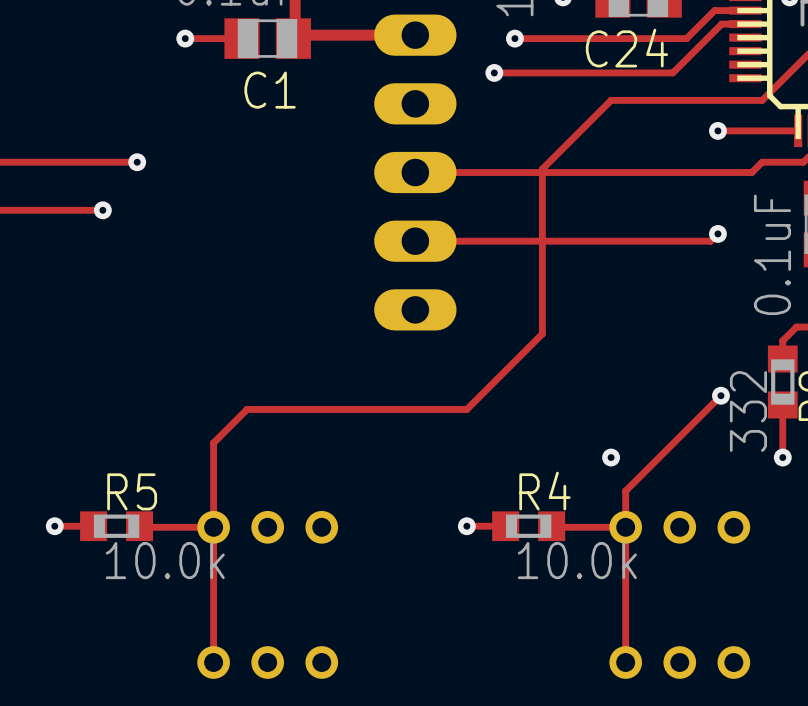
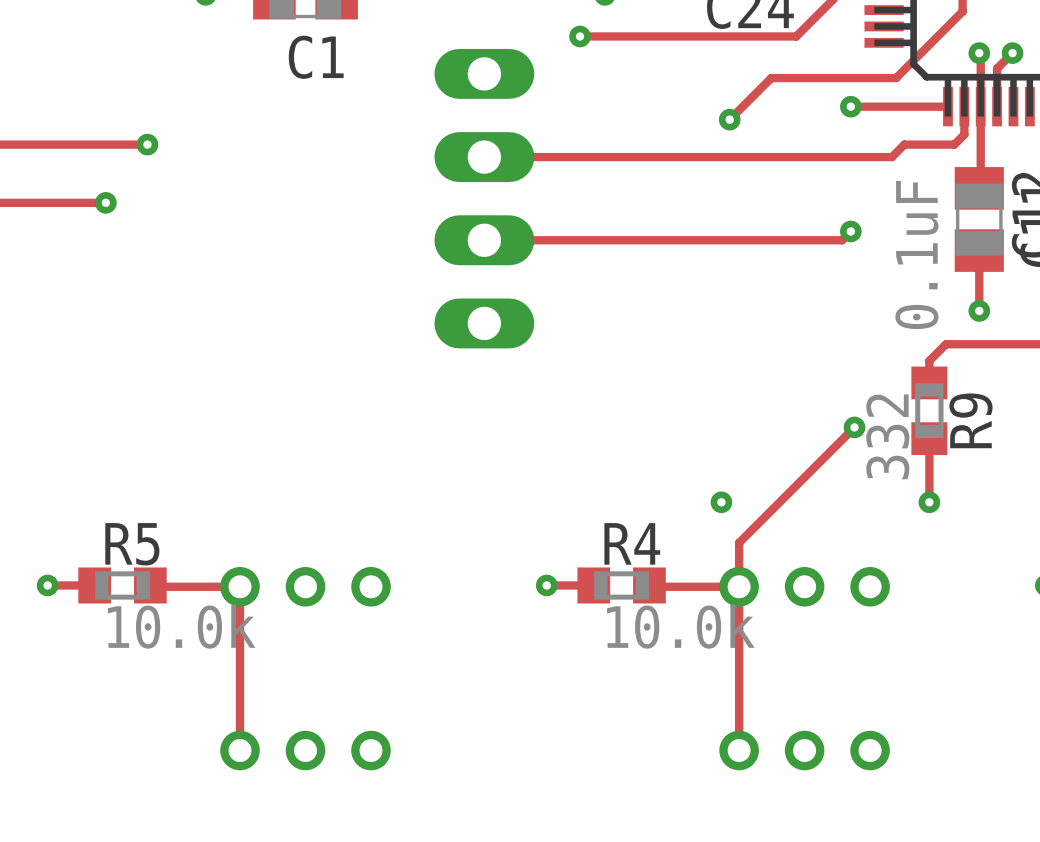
track: (762, 100) (611, 100) (542, 169) (542, 333) (466, 409) (247, 409) (213, 442) (213, 527) -> (904, 69) (896, 78) (771, 78) (729, 119)
via: none -> (729, 119)

